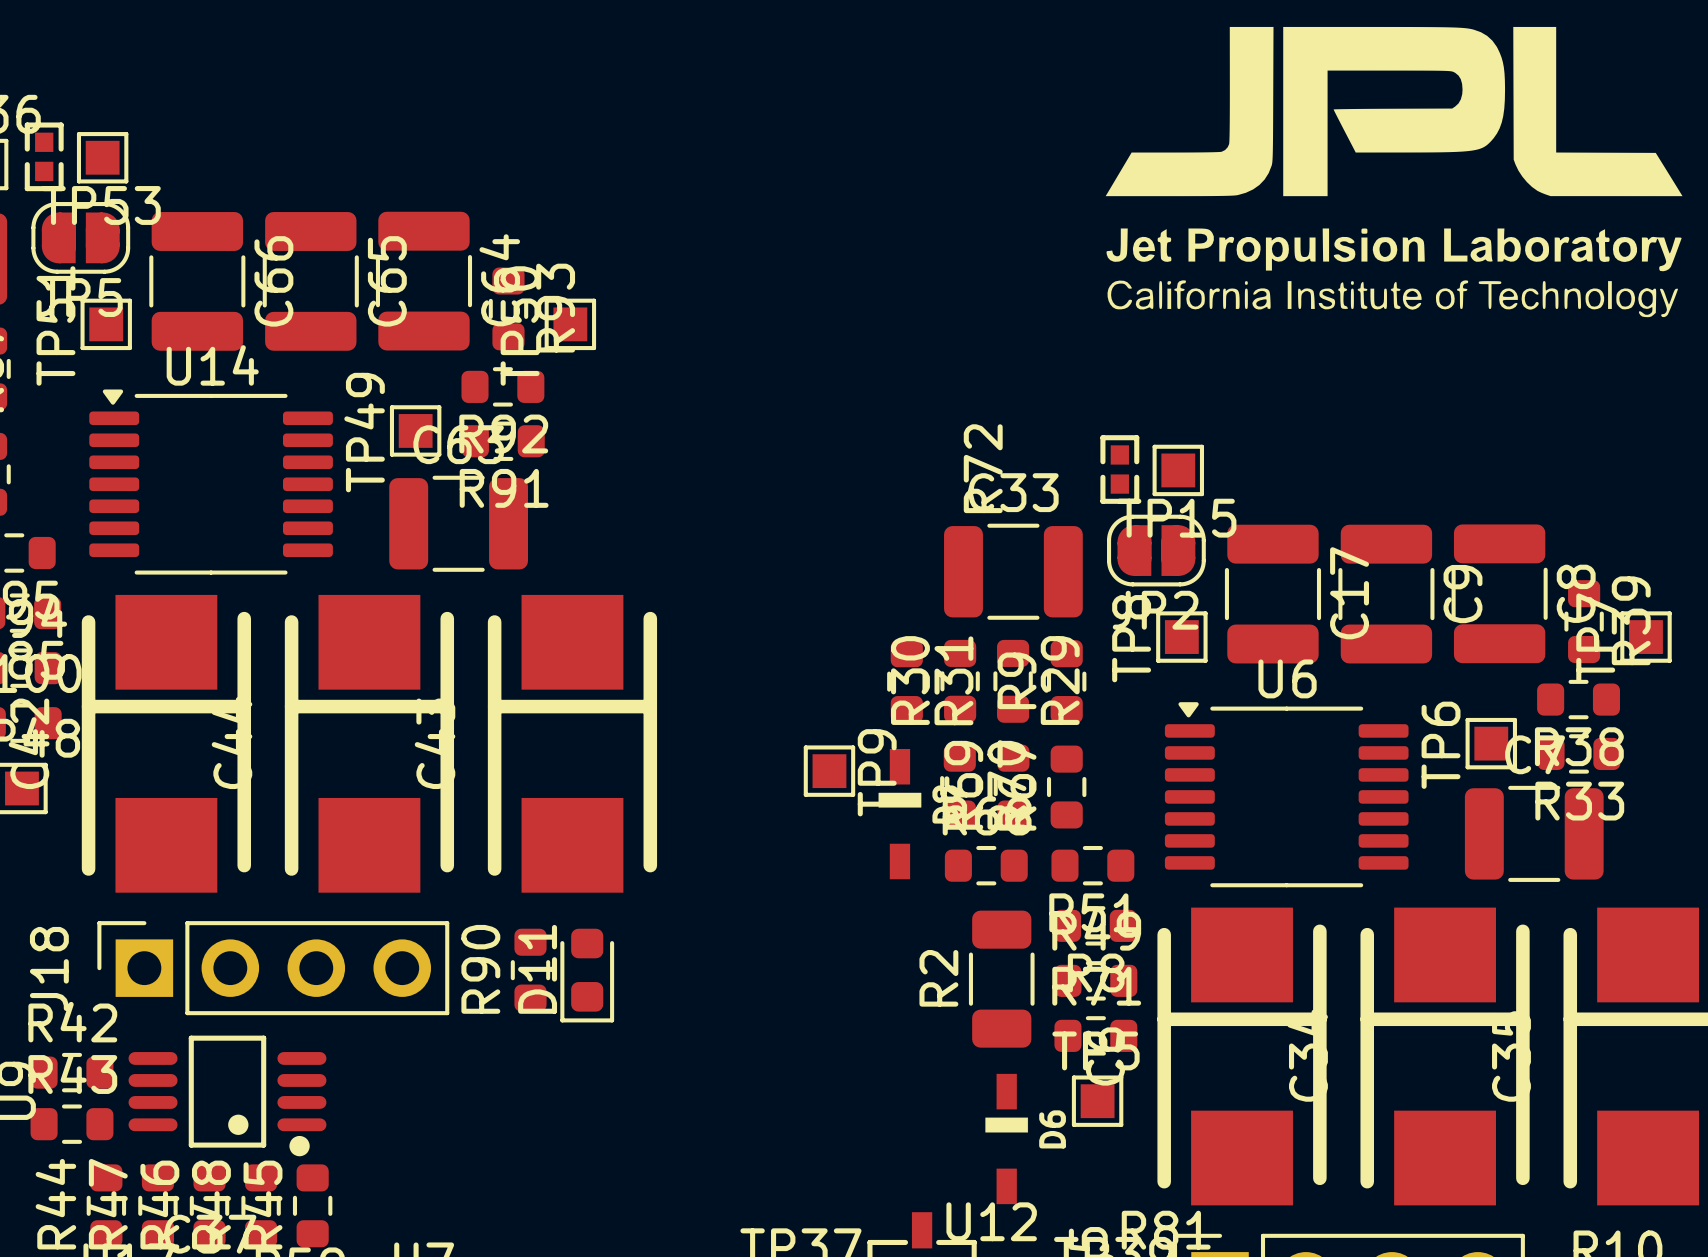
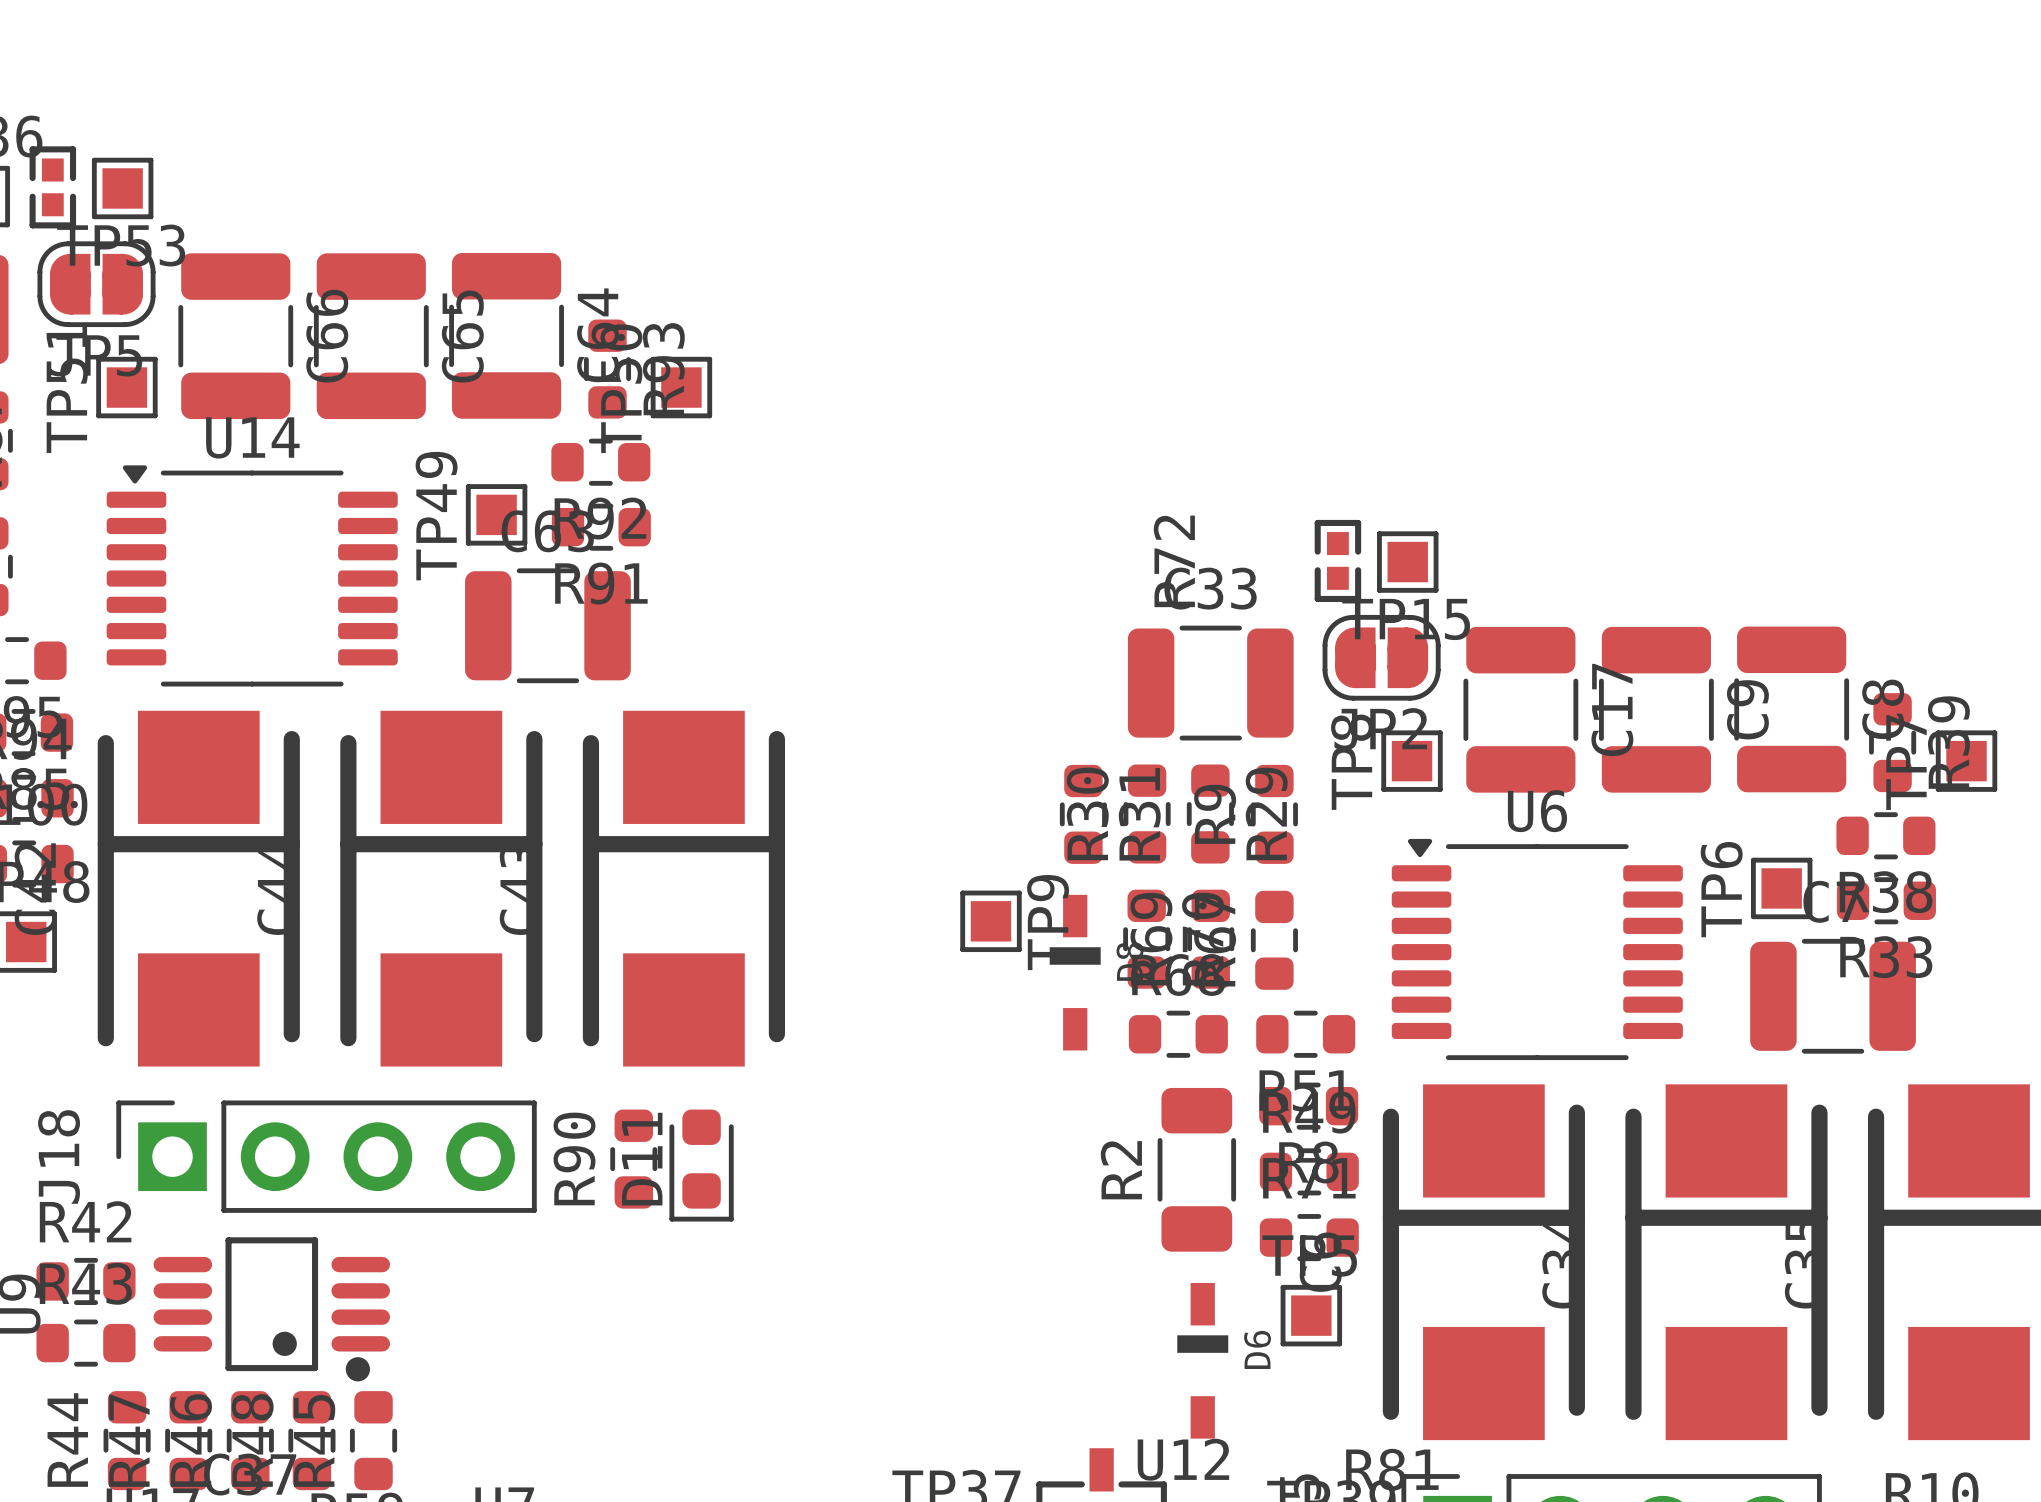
drawing: [1105, 26, 1683, 318] -> none

